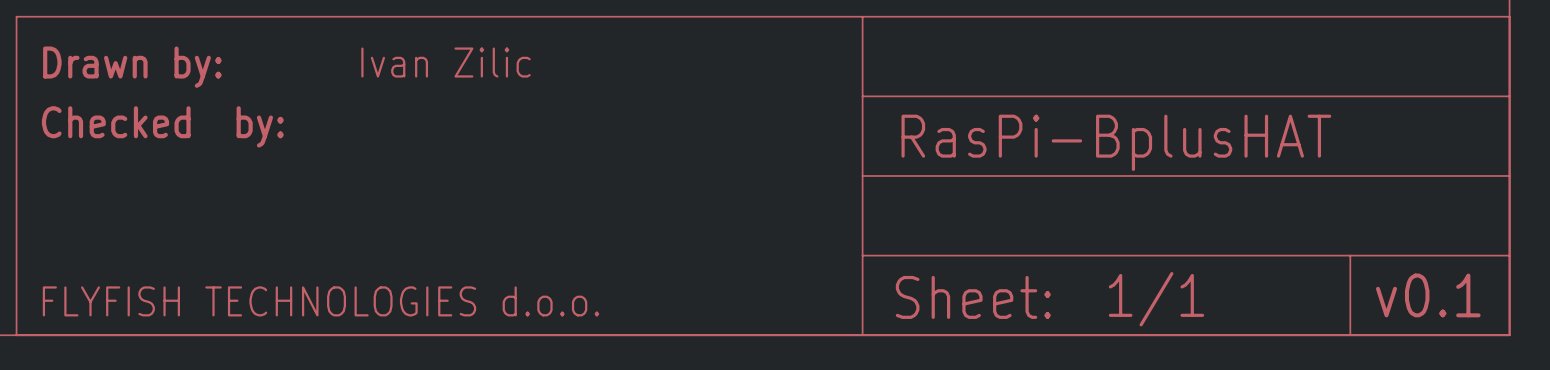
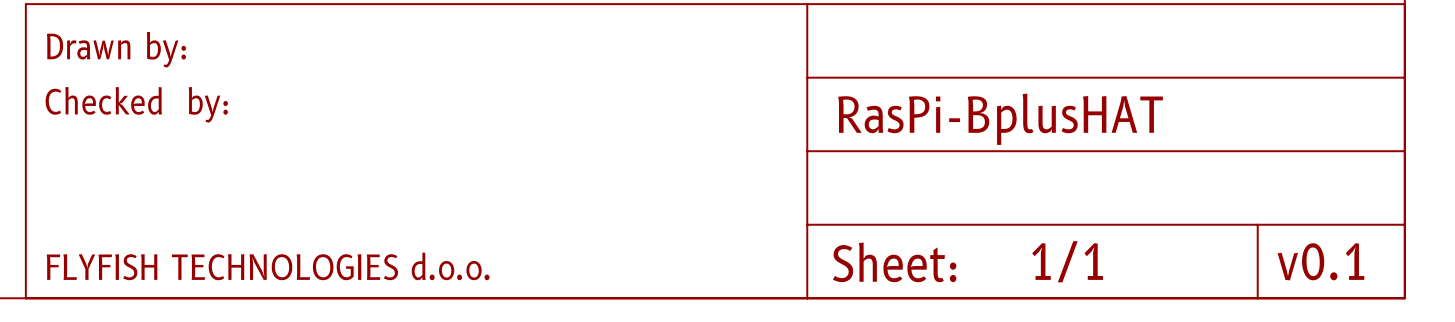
text: Ivan Zilic (446, 62) -> none

